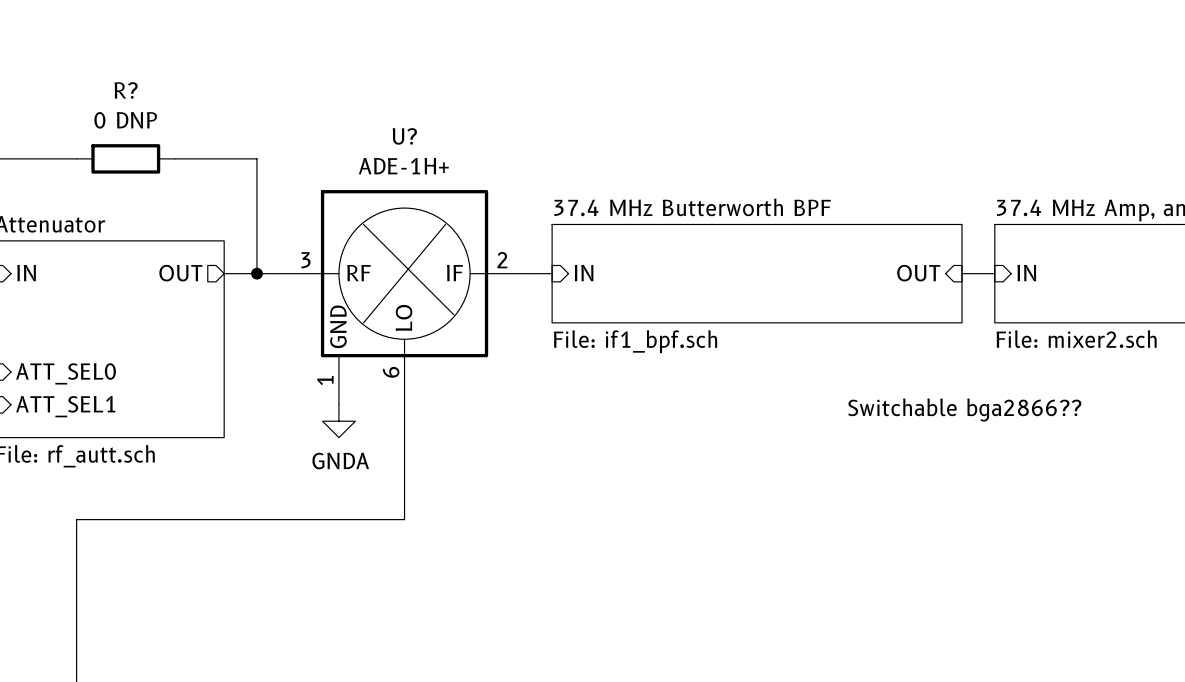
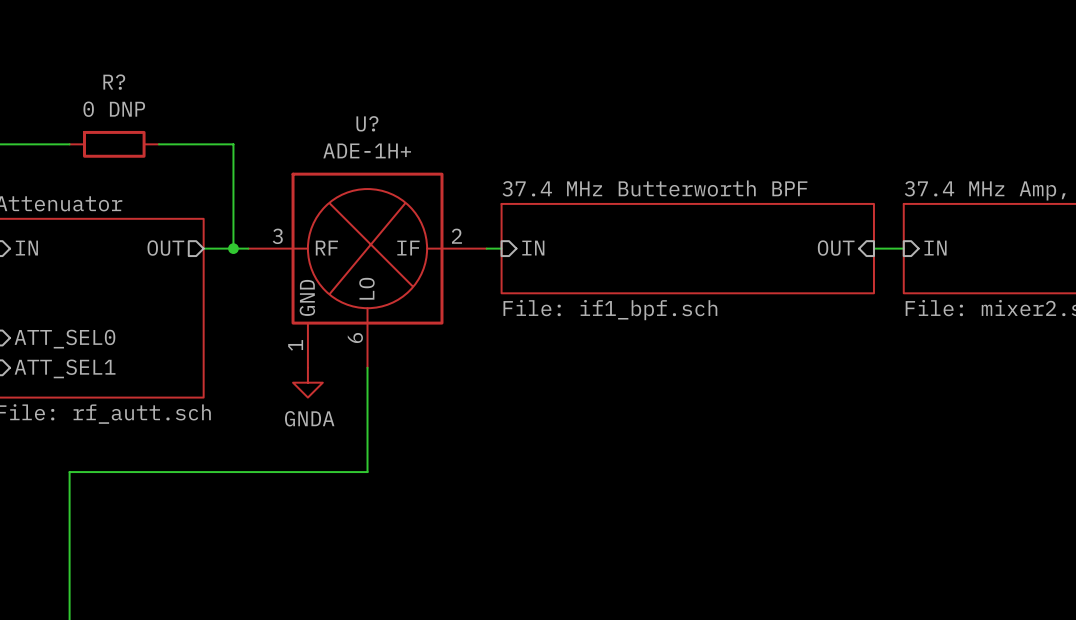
text: Switchable bga2866?? (964, 410) -> none

